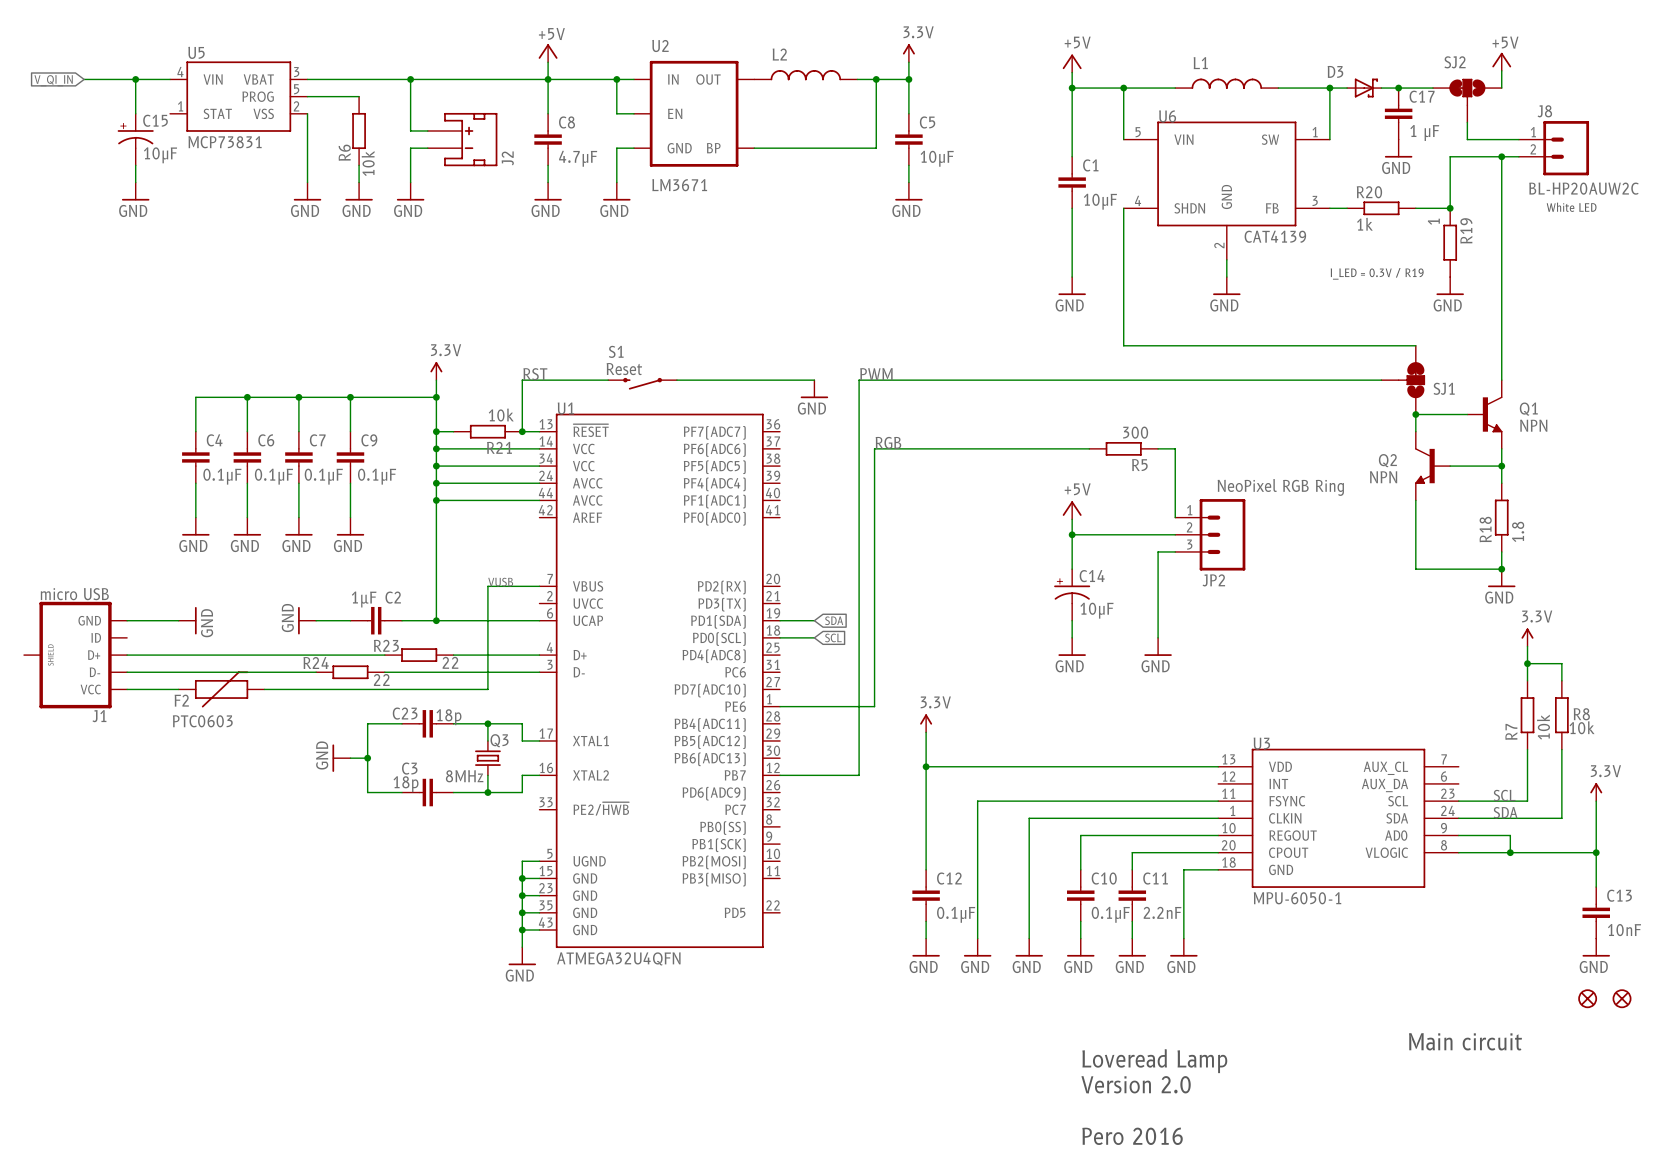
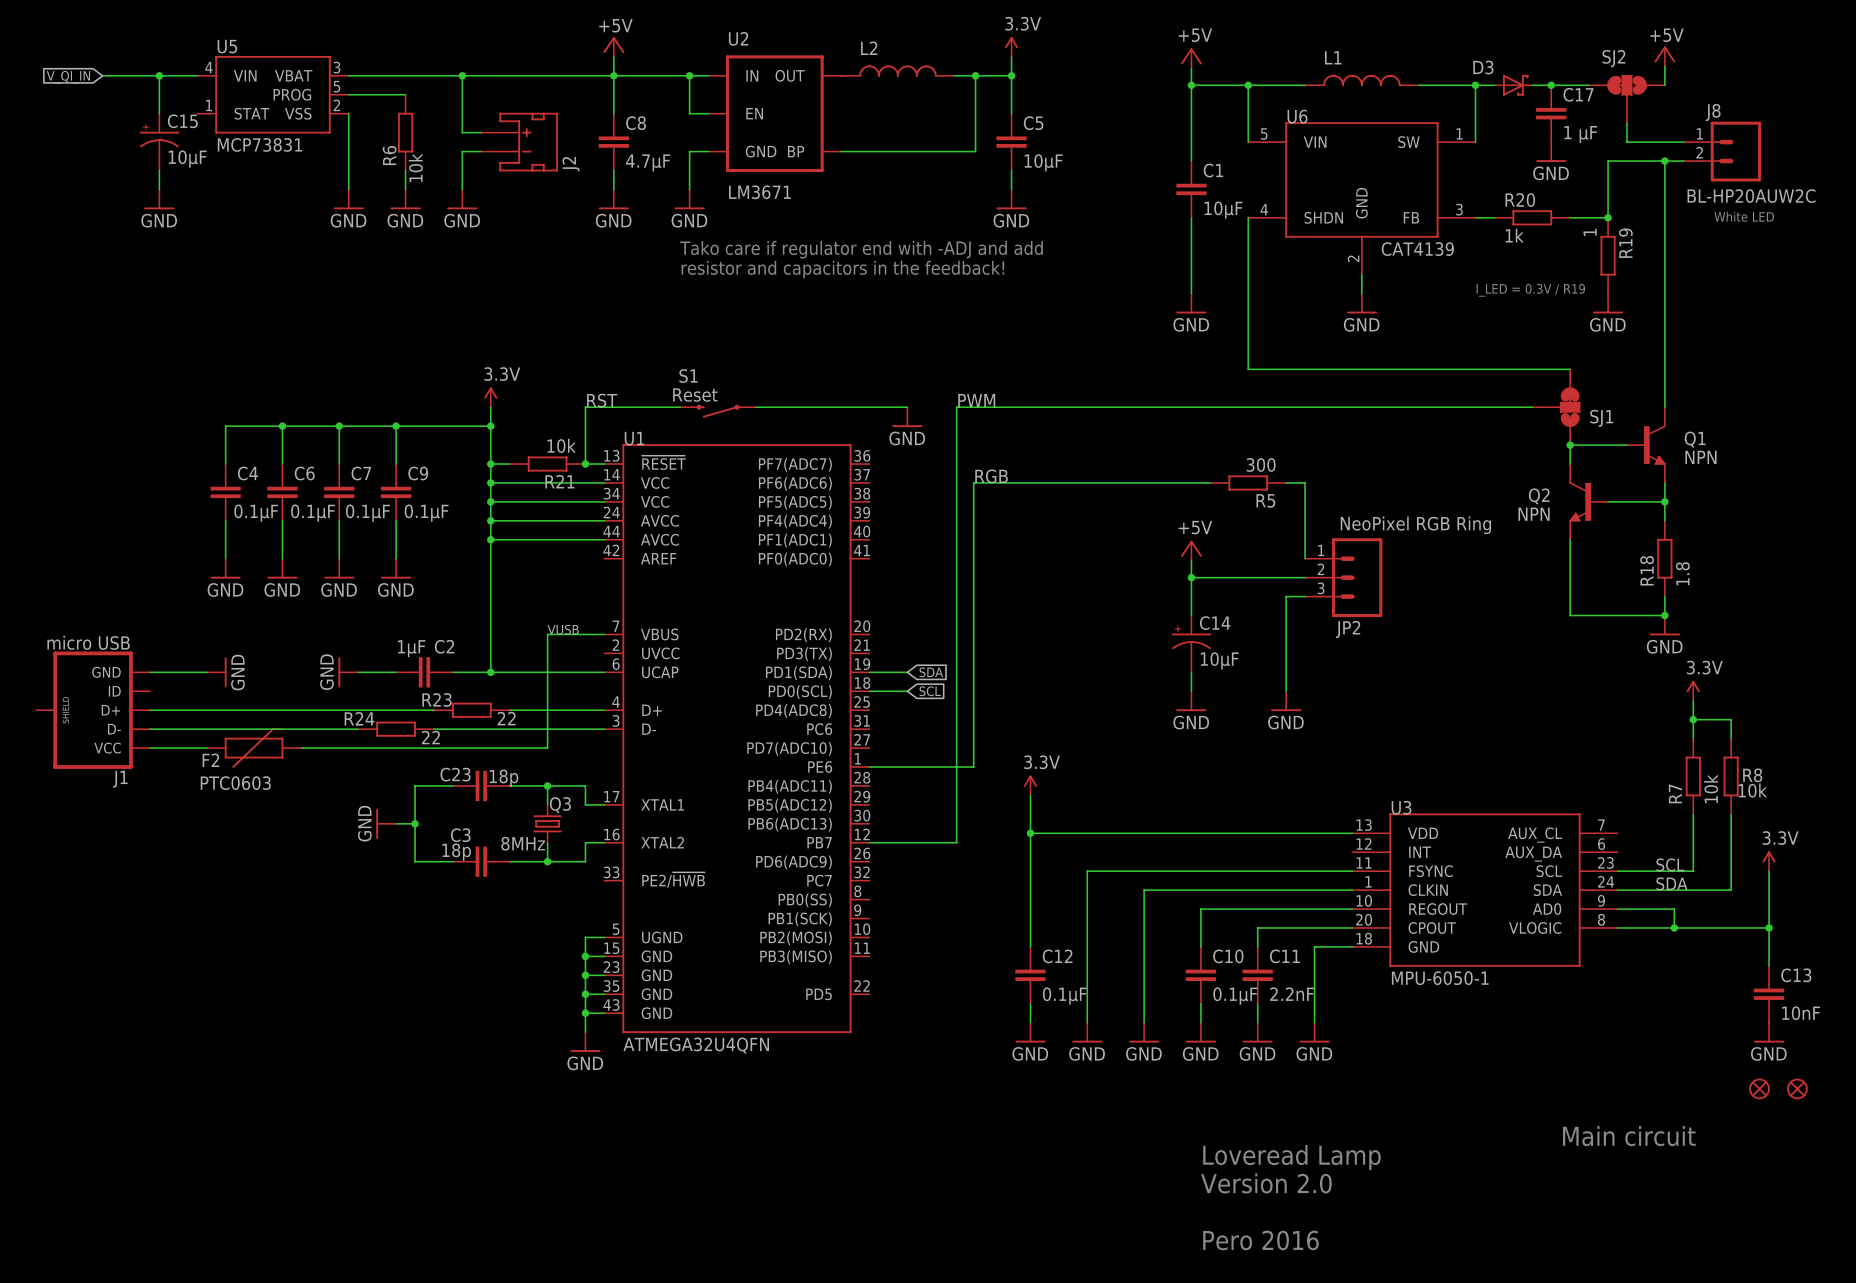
text: none -> Tako care if regulator end with -ADJ and add (861, 249)
text: none -> resistor and capacitors in the feedback! (842, 269)

